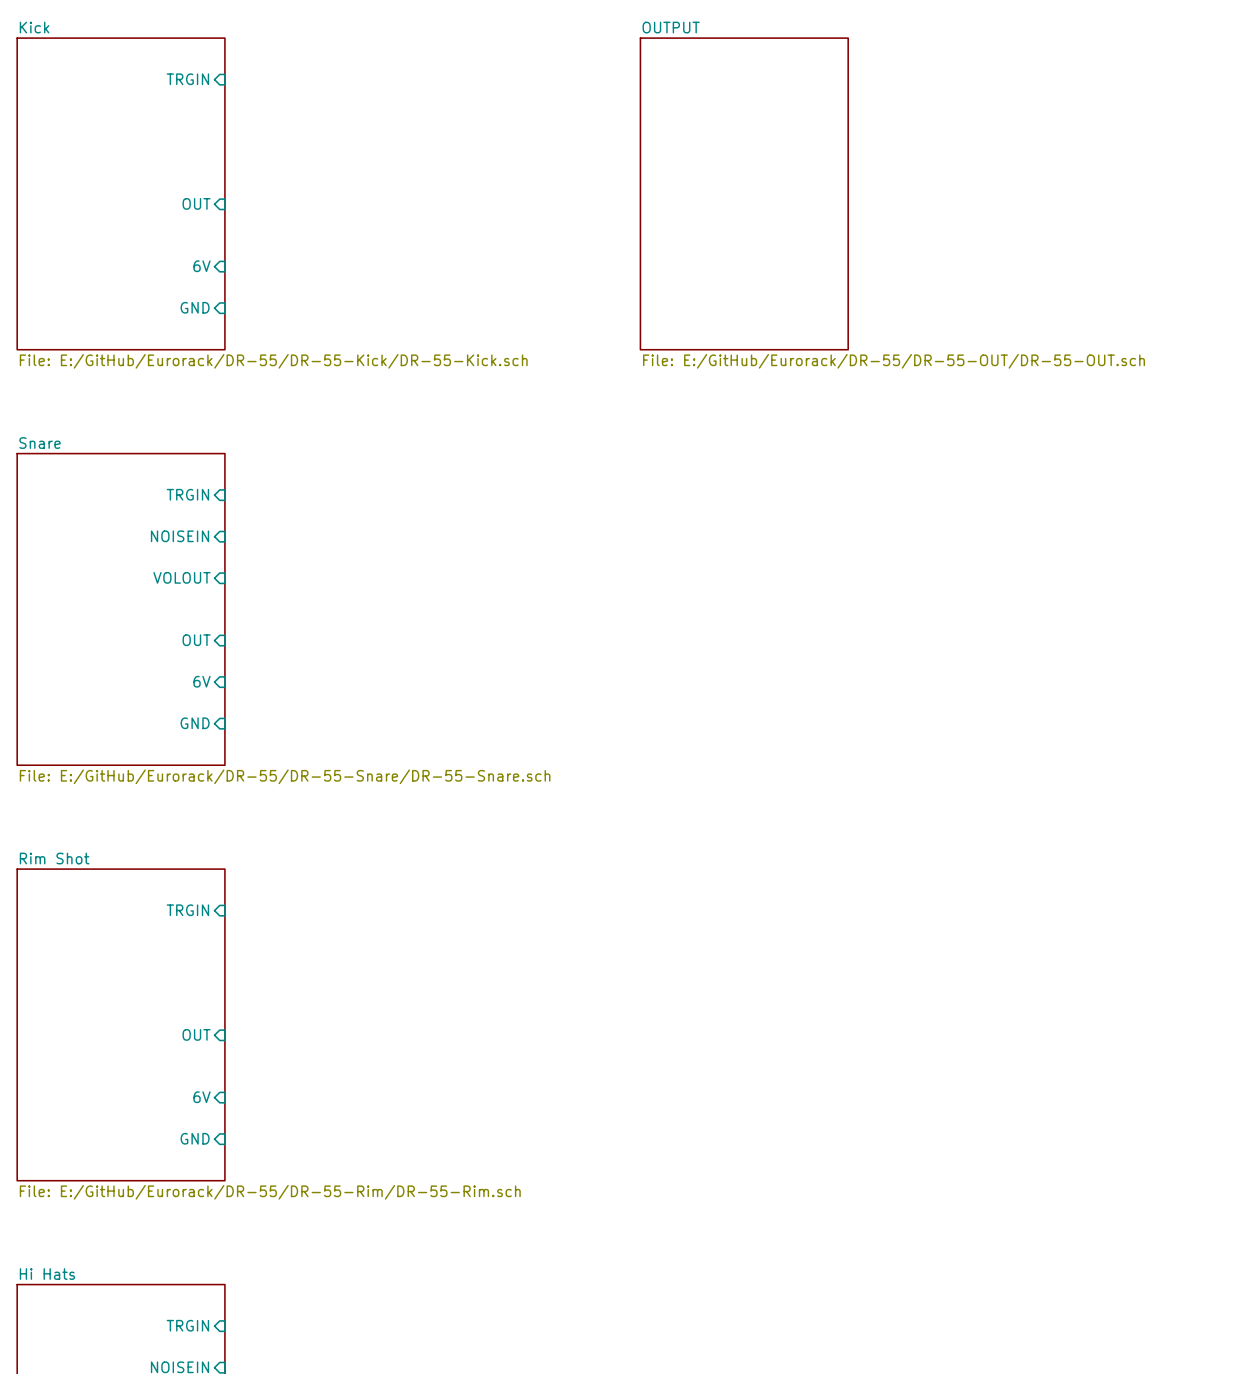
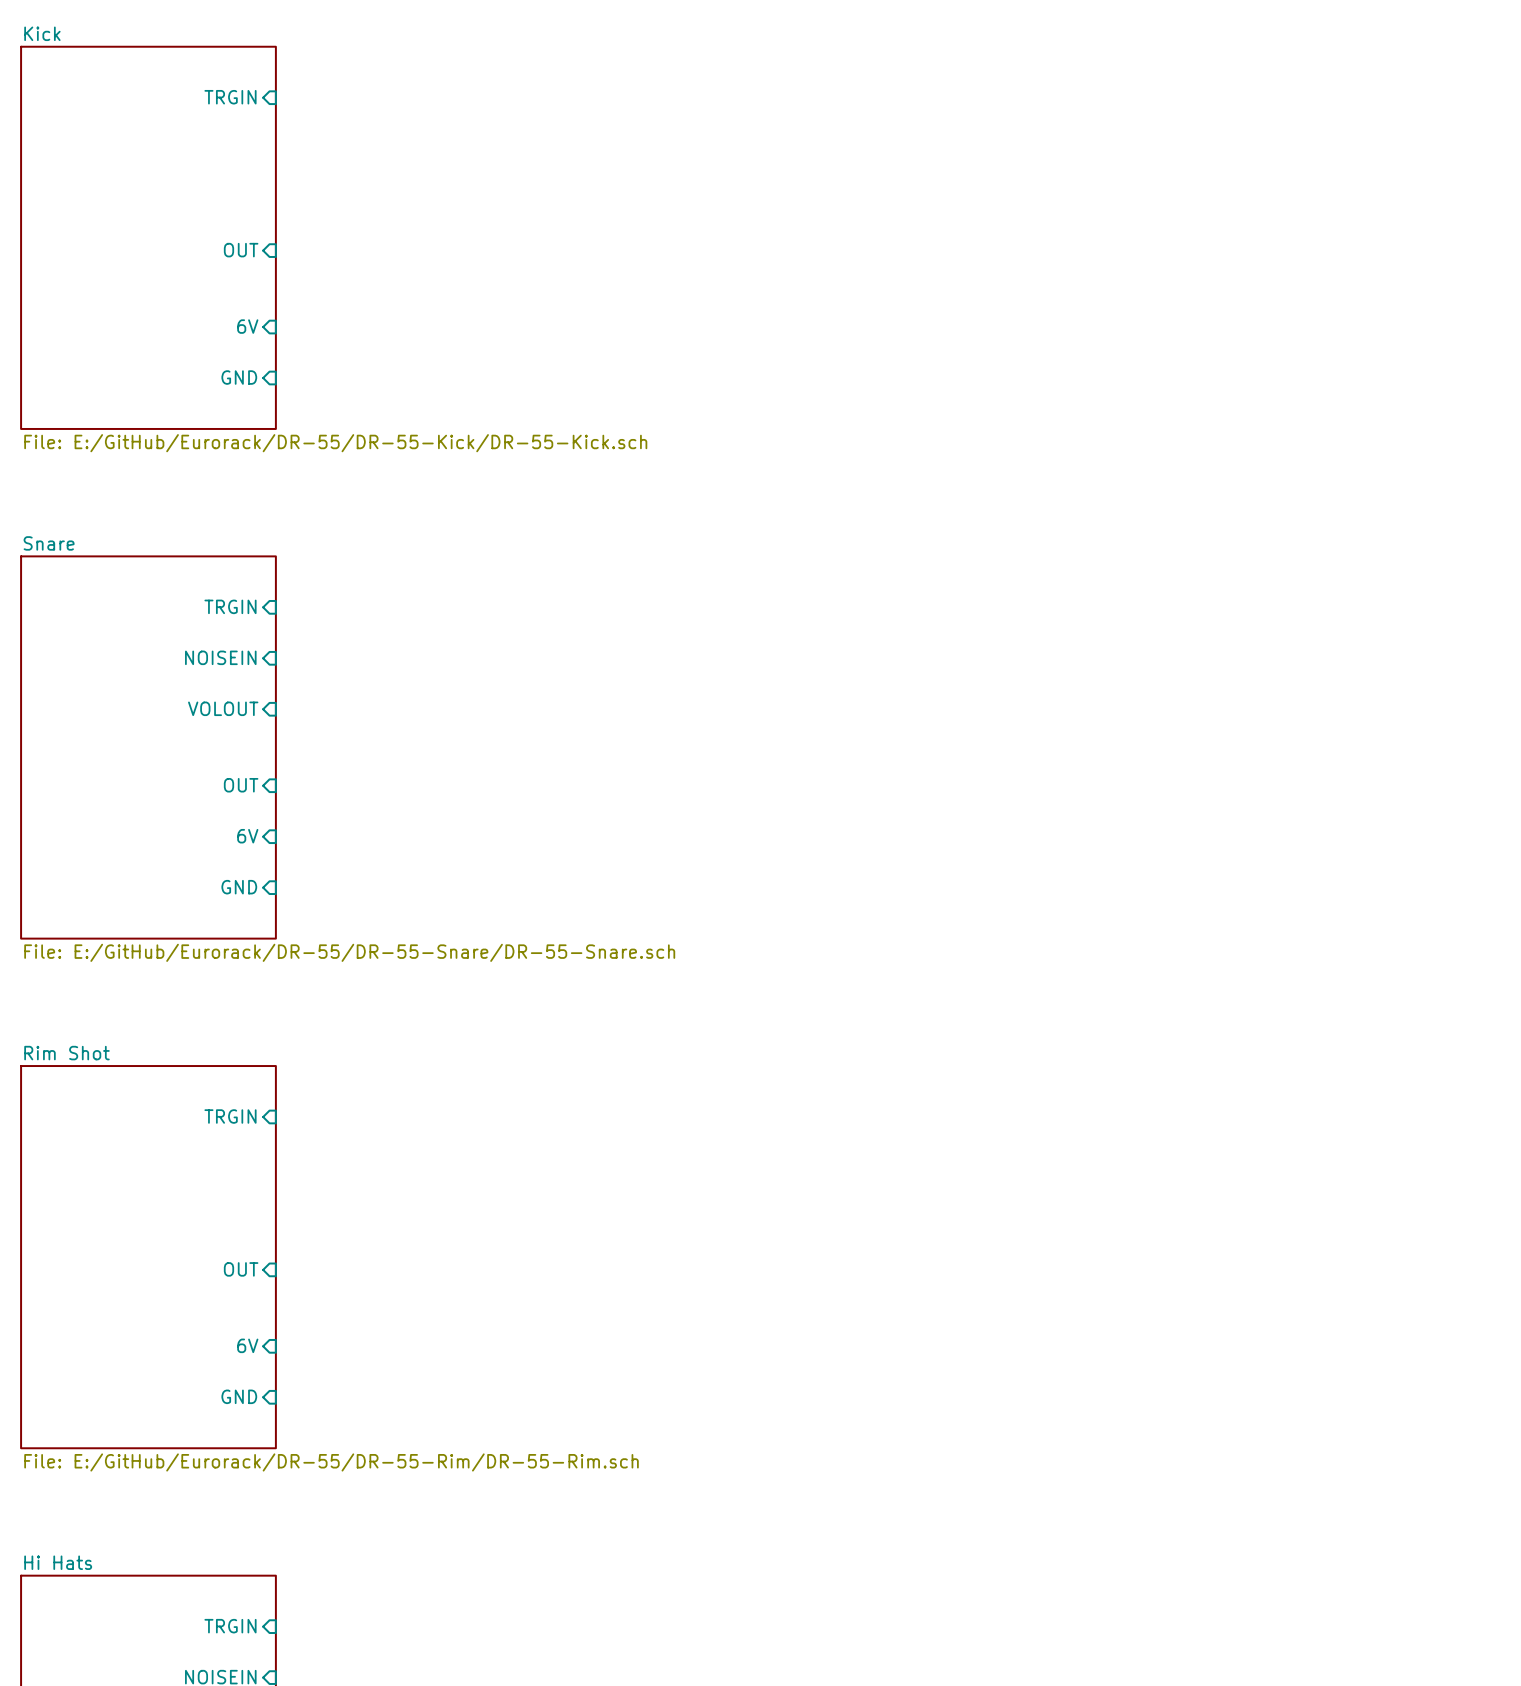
sheet OUTPUT: File: E:/GitHub/Eurorack/DR-55/DR-55-OUT/DR-55-OUT.sch (744, 193) -> none

